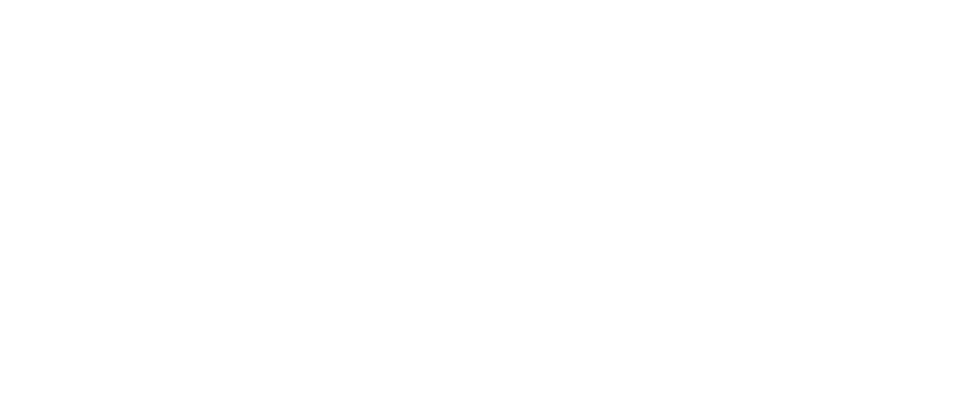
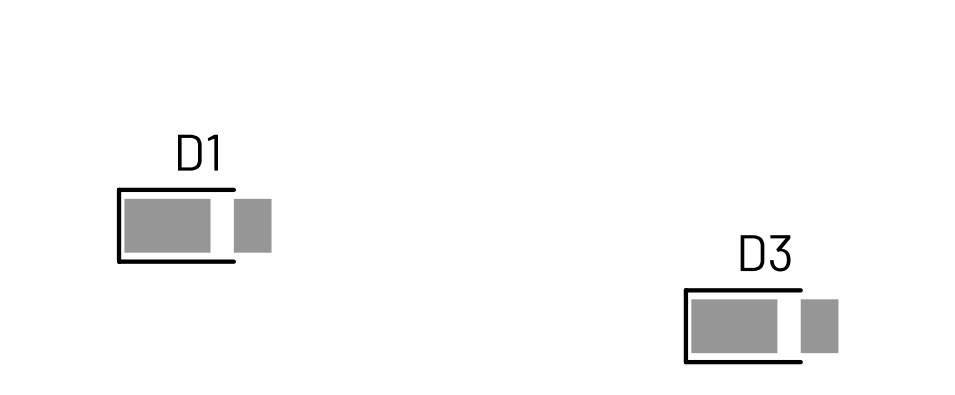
D1: none -> (194, 225)
D3: none -> (761, 326)

